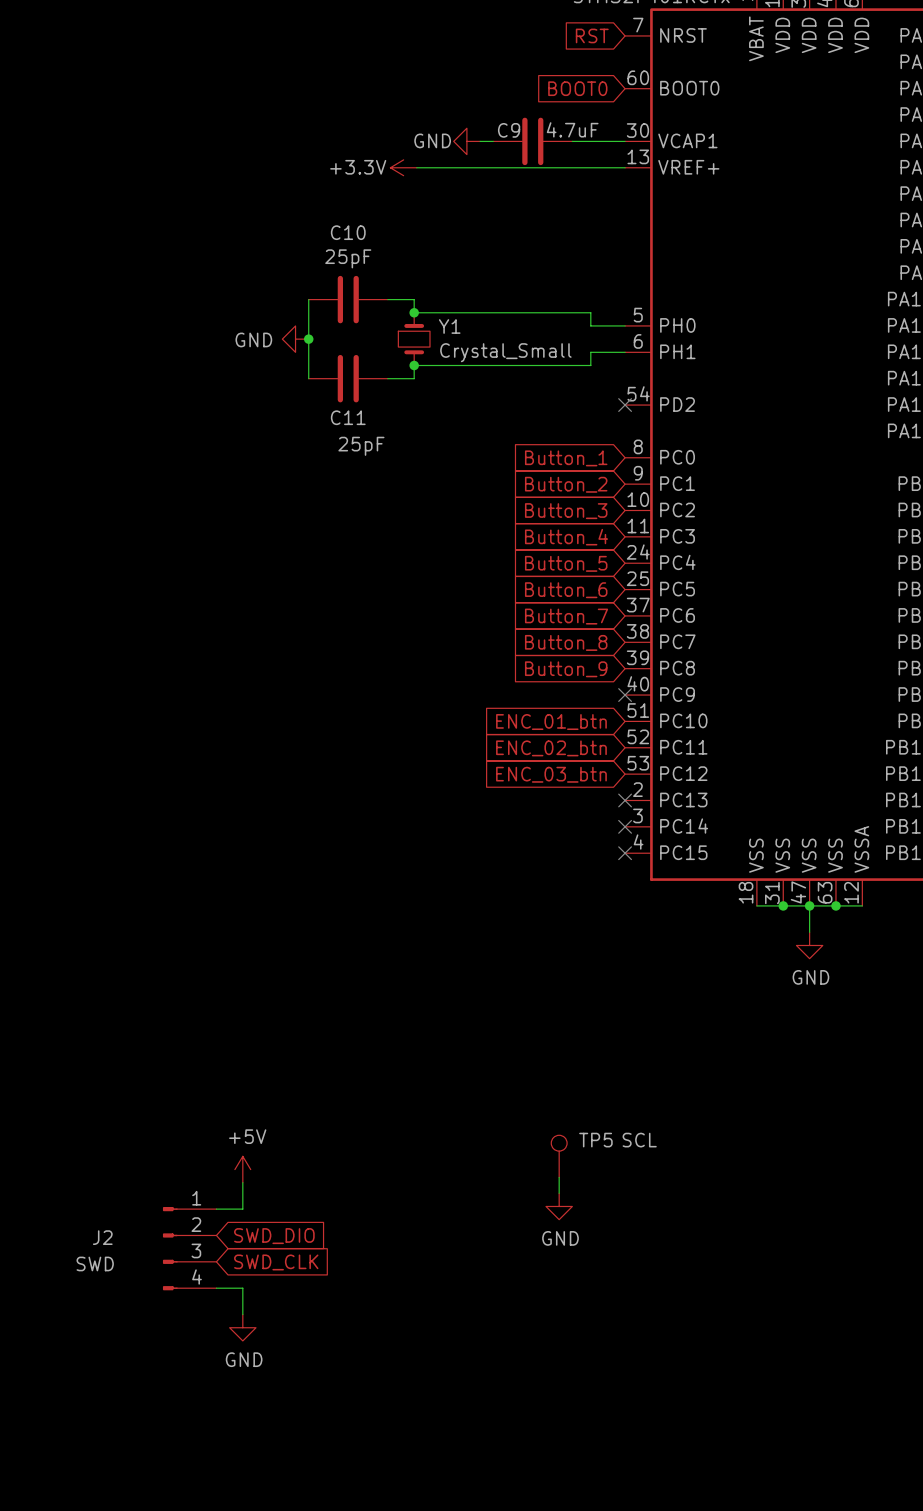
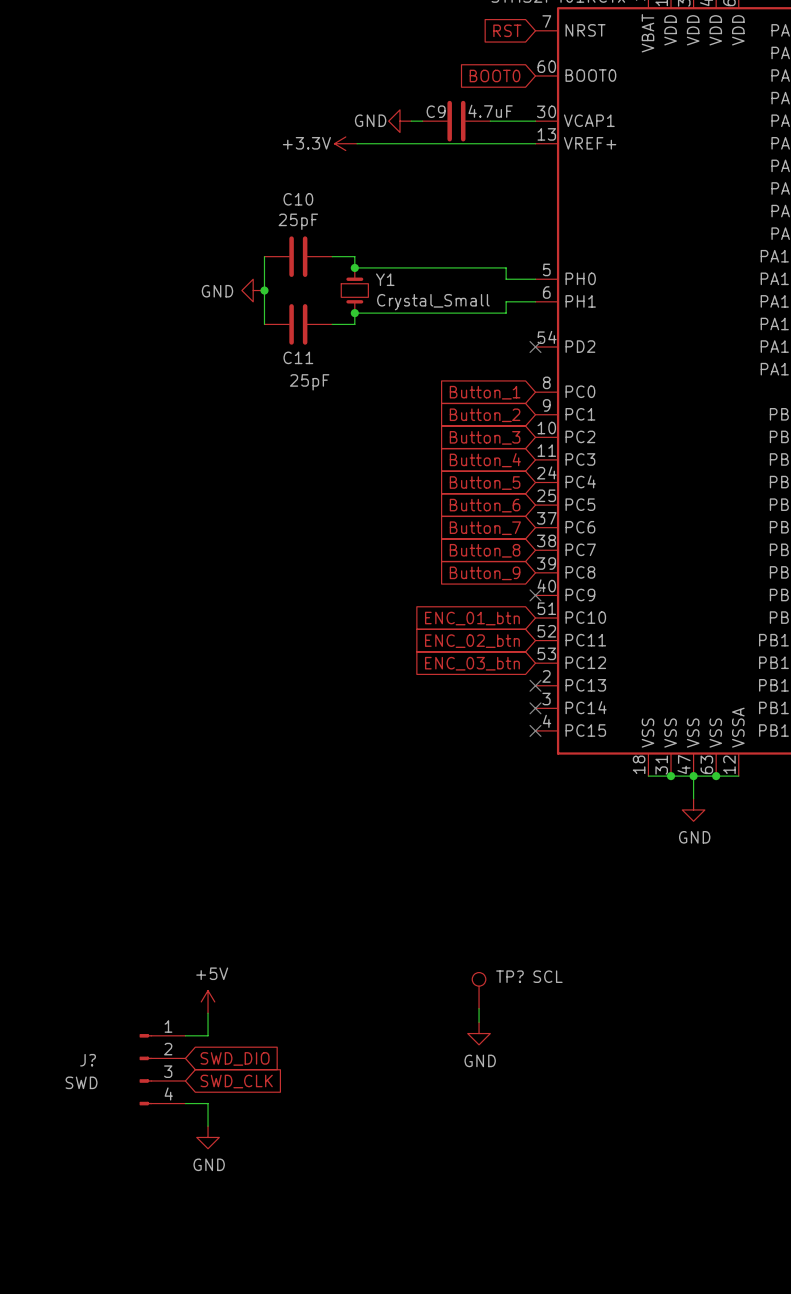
TP5 name: TP5 (595, 1140) -> TP? (509, 976)
J2 name: J2 (102, 1237) -> J? (88, 1060)

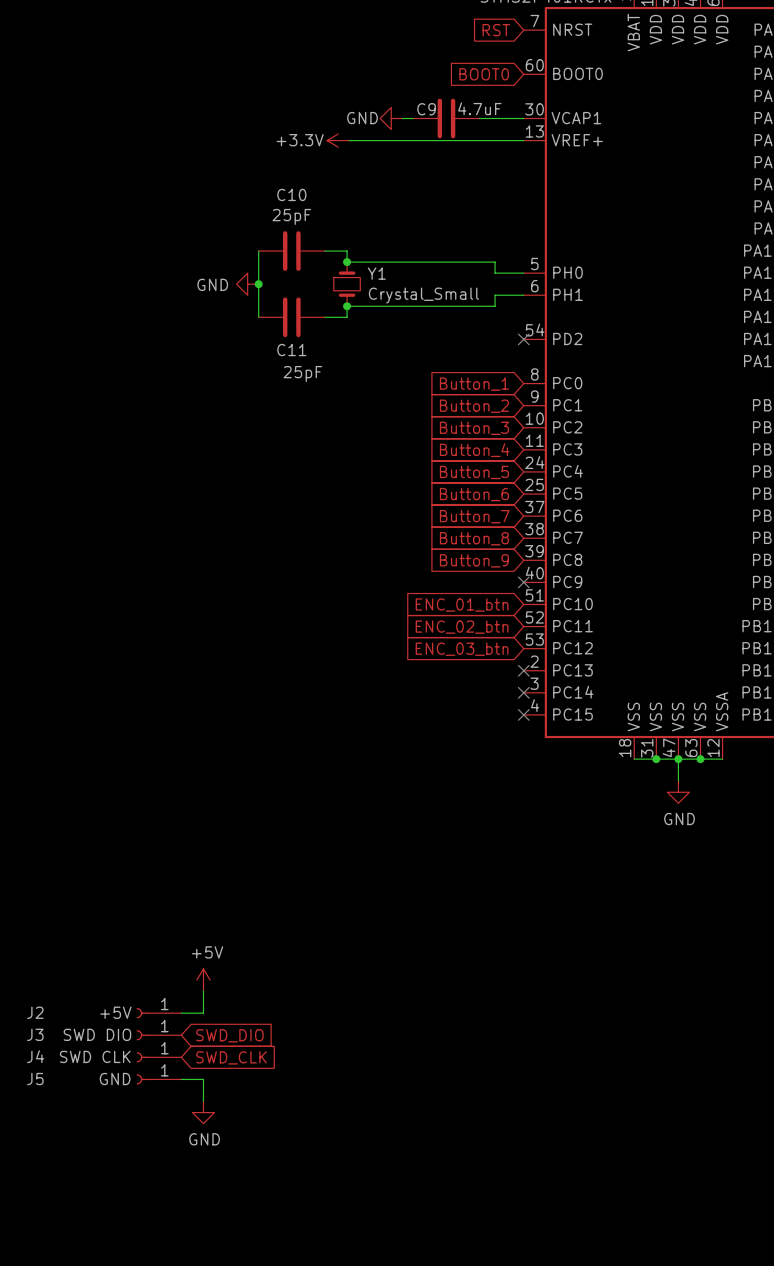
TP?: SCL (479, 990) -> none
wire: (479, 1008) (479, 1022) -> none
power symbol: GND (479, 1033) -> none
J2: none -> +5V (158, 1013)
J3: none -> SWD DIO (158, 1035)
J?: SWD (162, 1069) -> none
J4: none -> SWD CLK (158, 1057)
J5: none -> GND (158, 1079)

